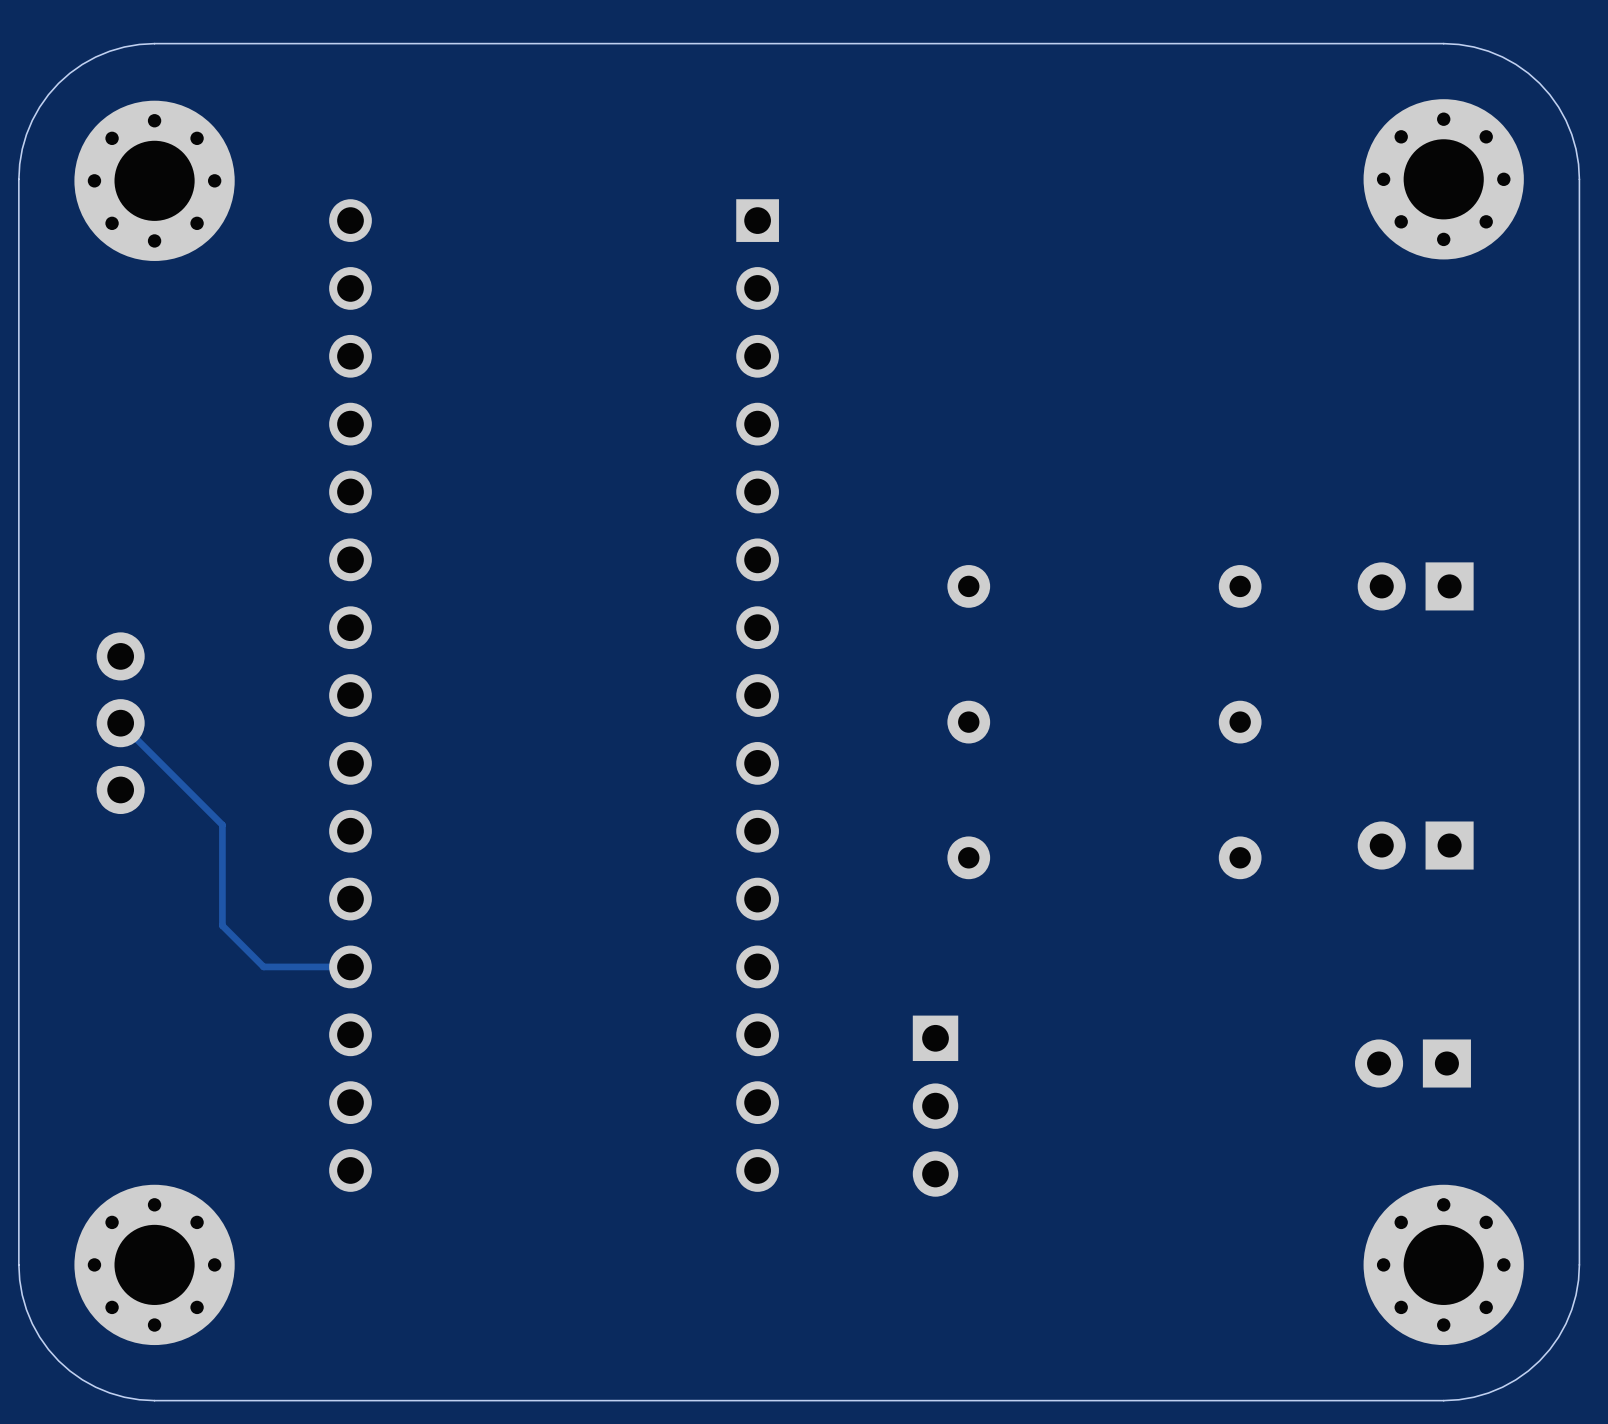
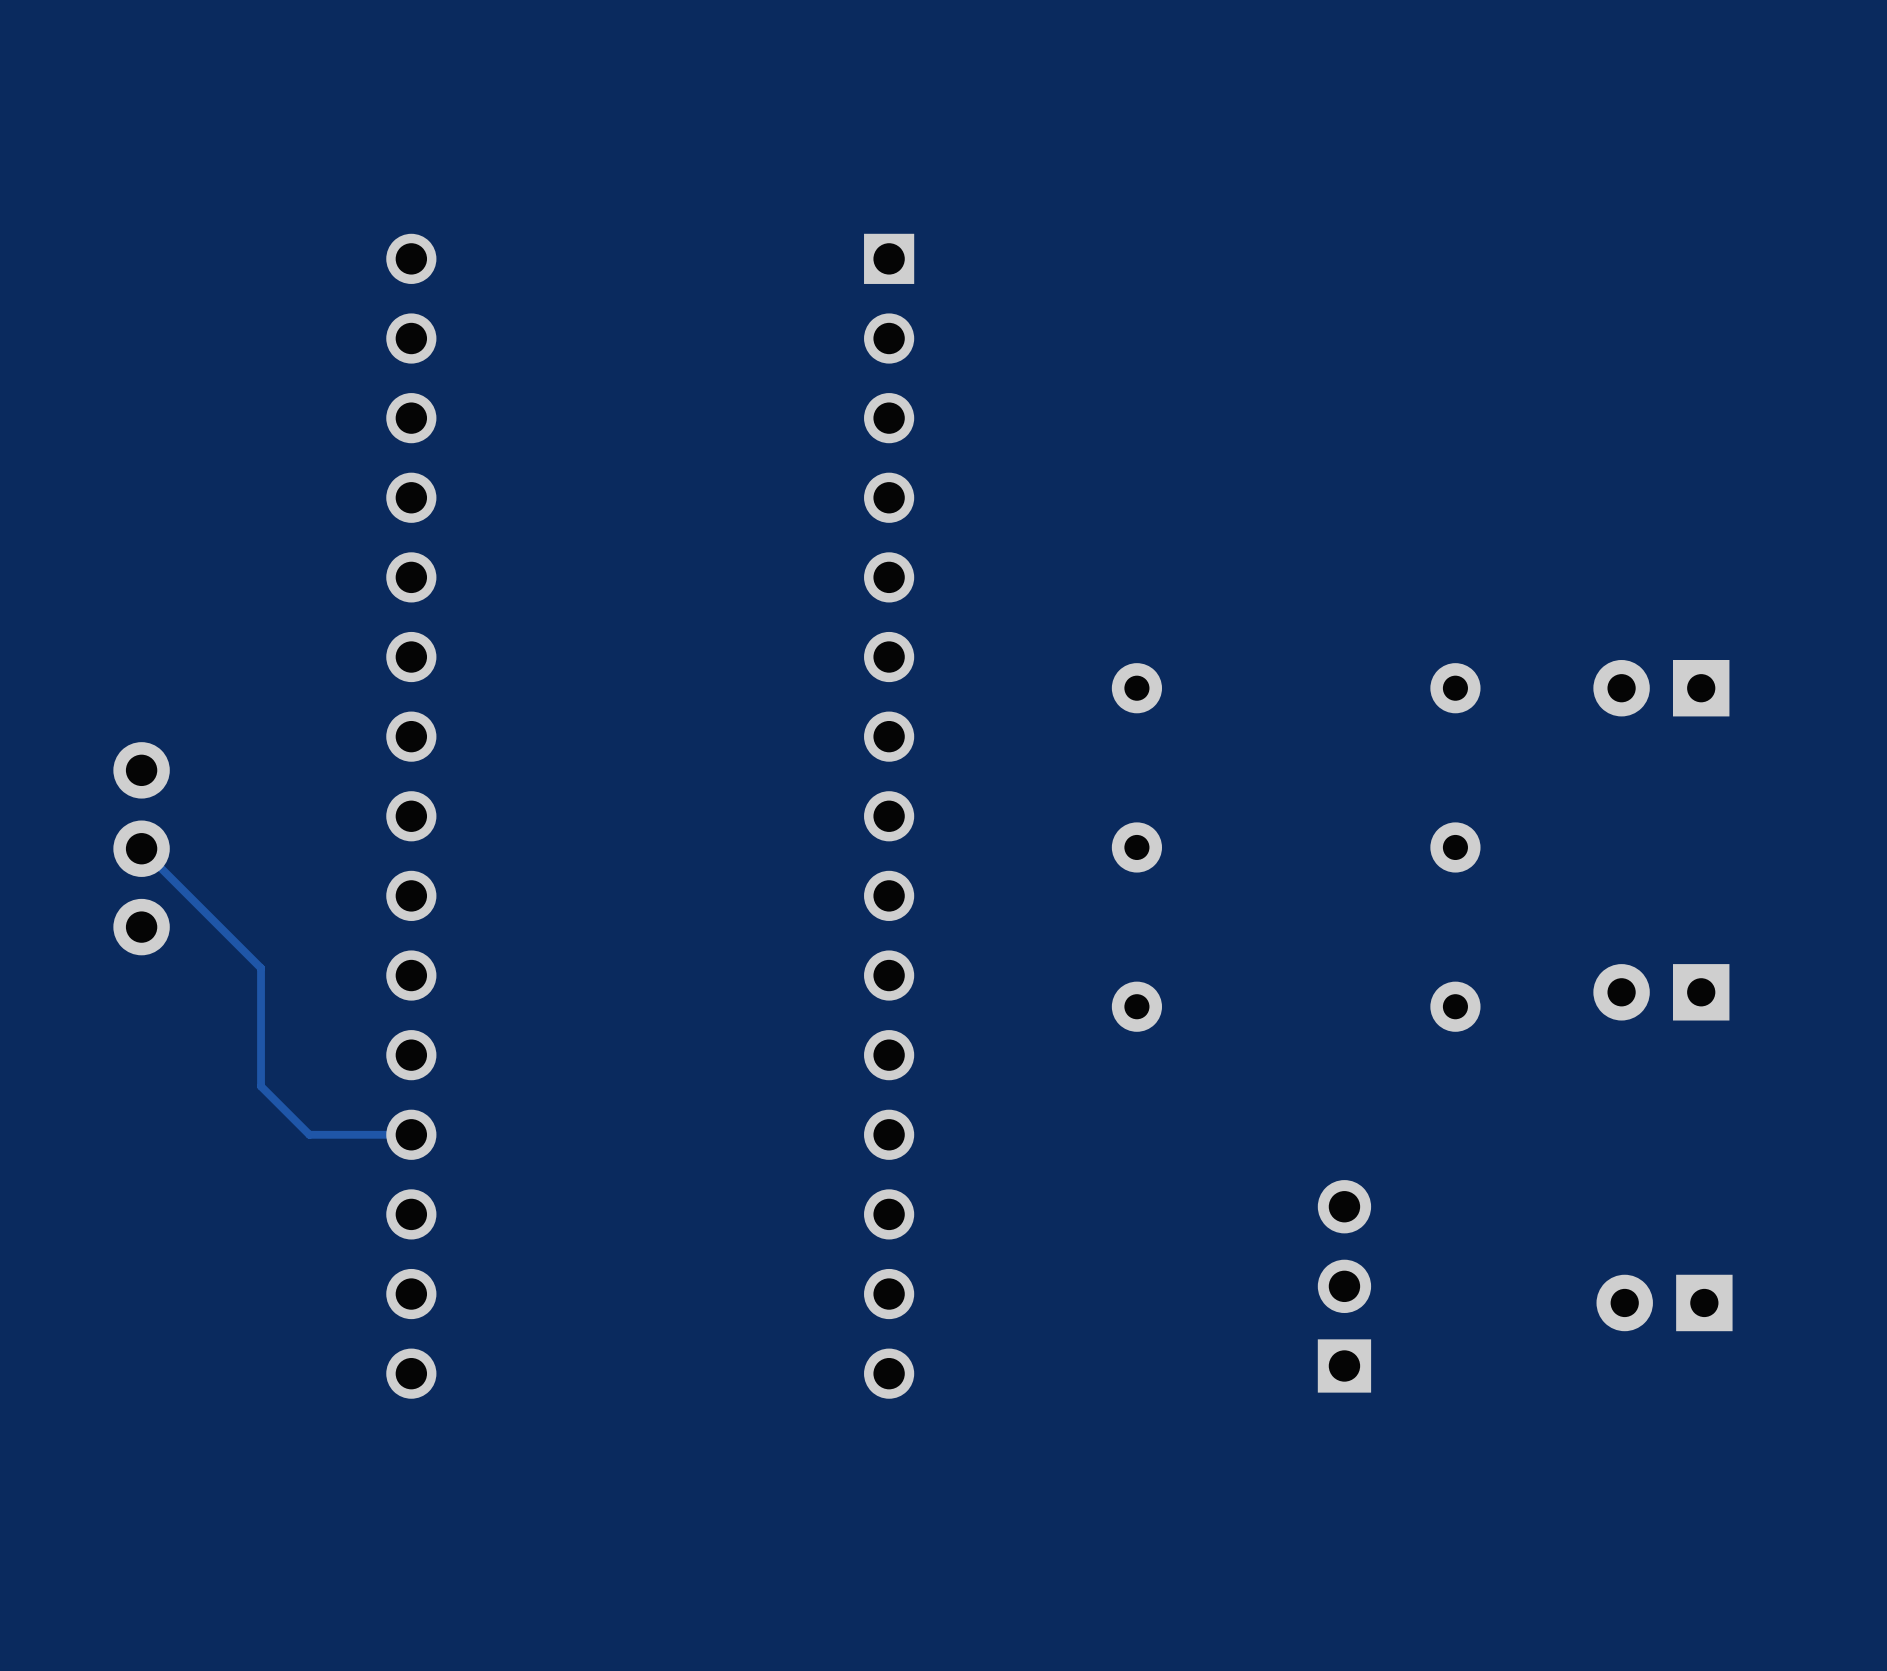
board edge: (1443, 43) (154, 43) (139, 44) (109, 51) (82, 64) (58, 83) (39, 107) (32, 120) (22, 149) (18, 179) (18, 1264) (22, 1295) (32, 1323) (39, 1337) (58, 1360) (82, 1379) (109, 1393) (124, 1397) (154, 1400) (1443, 1400) (1473, 1397) (1502, 1387) (1515, 1379) (1539, 1360) (1558, 1337) (1565, 1323) (1576, 1295) (1579, 1264) (1578, 164) (1571, 134) (1565, 120) (1549, 94) (1539, 83) (1528, 73) (1502, 57) (1473, 47) (1443, 43) -> none
part: (1443, 179) -> none
part: (154, 180) -> none
part position: (1412, 1063) -> (1664, 1302)
part rotation: 0° (935, 1106) -> 180° (1344, 1286)
part position: (935, 1106) -> (1344, 1286)
part: (154, 1264) -> none
part: (1443, 1264) -> none

